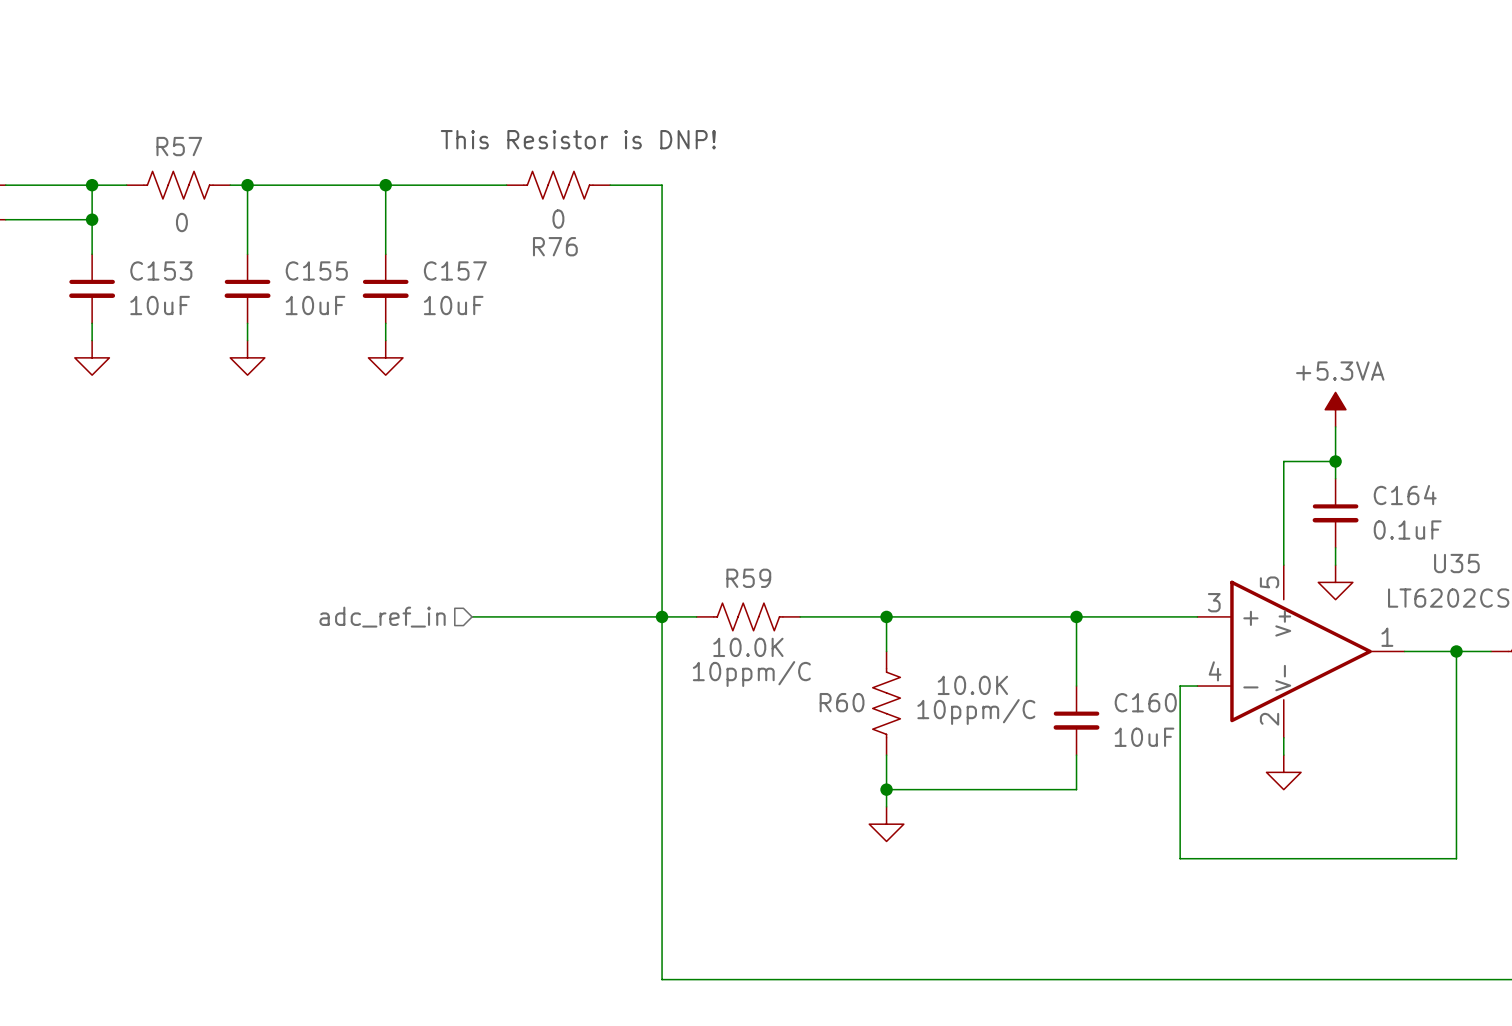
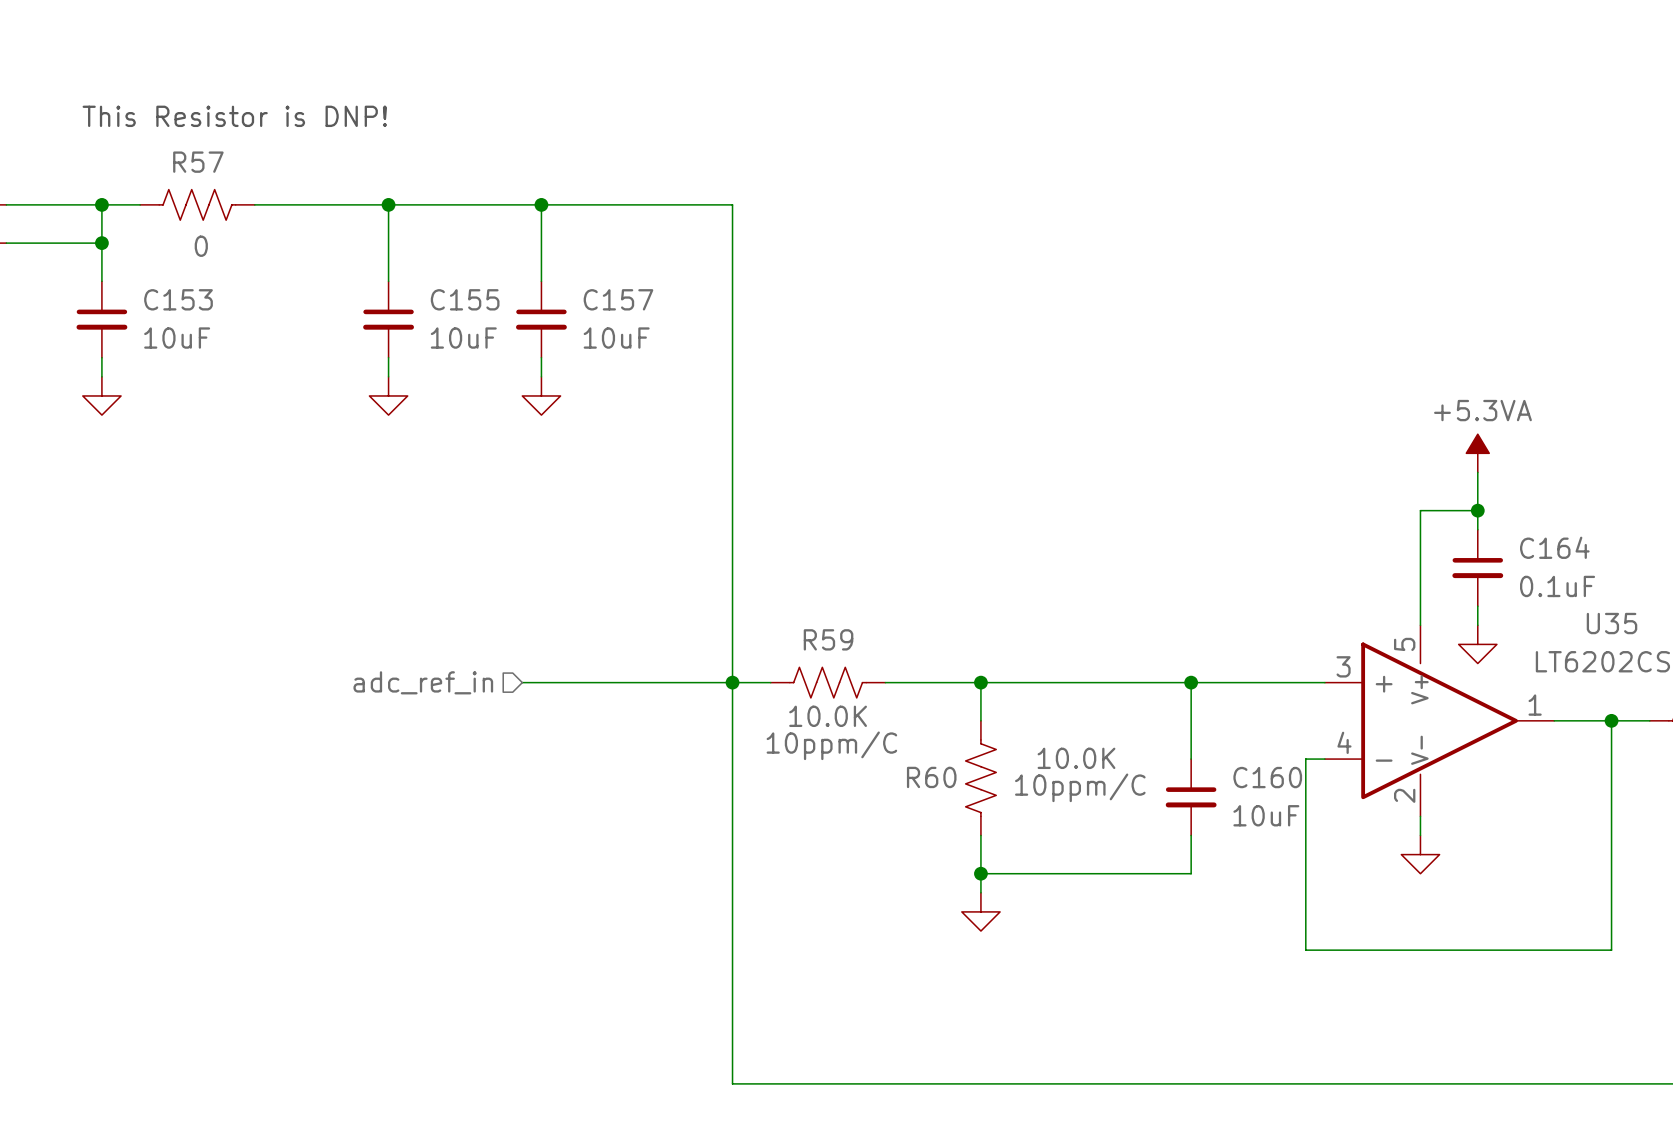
text: none -> This Resistor is DNP! (234, 116)
text: This Resistor is DNP! (578, 139) -> none
wire: (247, 185) (247, 254) -> (388, 204) (388, 281)
junction: (247, 185) -> none
wire: (385, 185) (385, 254) -> (541, 204) (541, 281)
junction position: (385, 185) -> (388, 204)
junction: none -> (541, 204)
wire: none -> (560, 204) (675, 204)
R76: 0 (558, 185) -> none
C155 position: (247, 288) -> (388, 319)
C157 position: (385, 288) -> (541, 319)
wire: (247, 323) (247, 340) -> (388, 357) (388, 376)
wire: (385, 323) (385, 340) -> (541, 357) (541, 376)
power symbol: (247, 357) -> none
power symbol position: (385, 357) -> (388, 395)
power symbol: none -> (541, 395)

